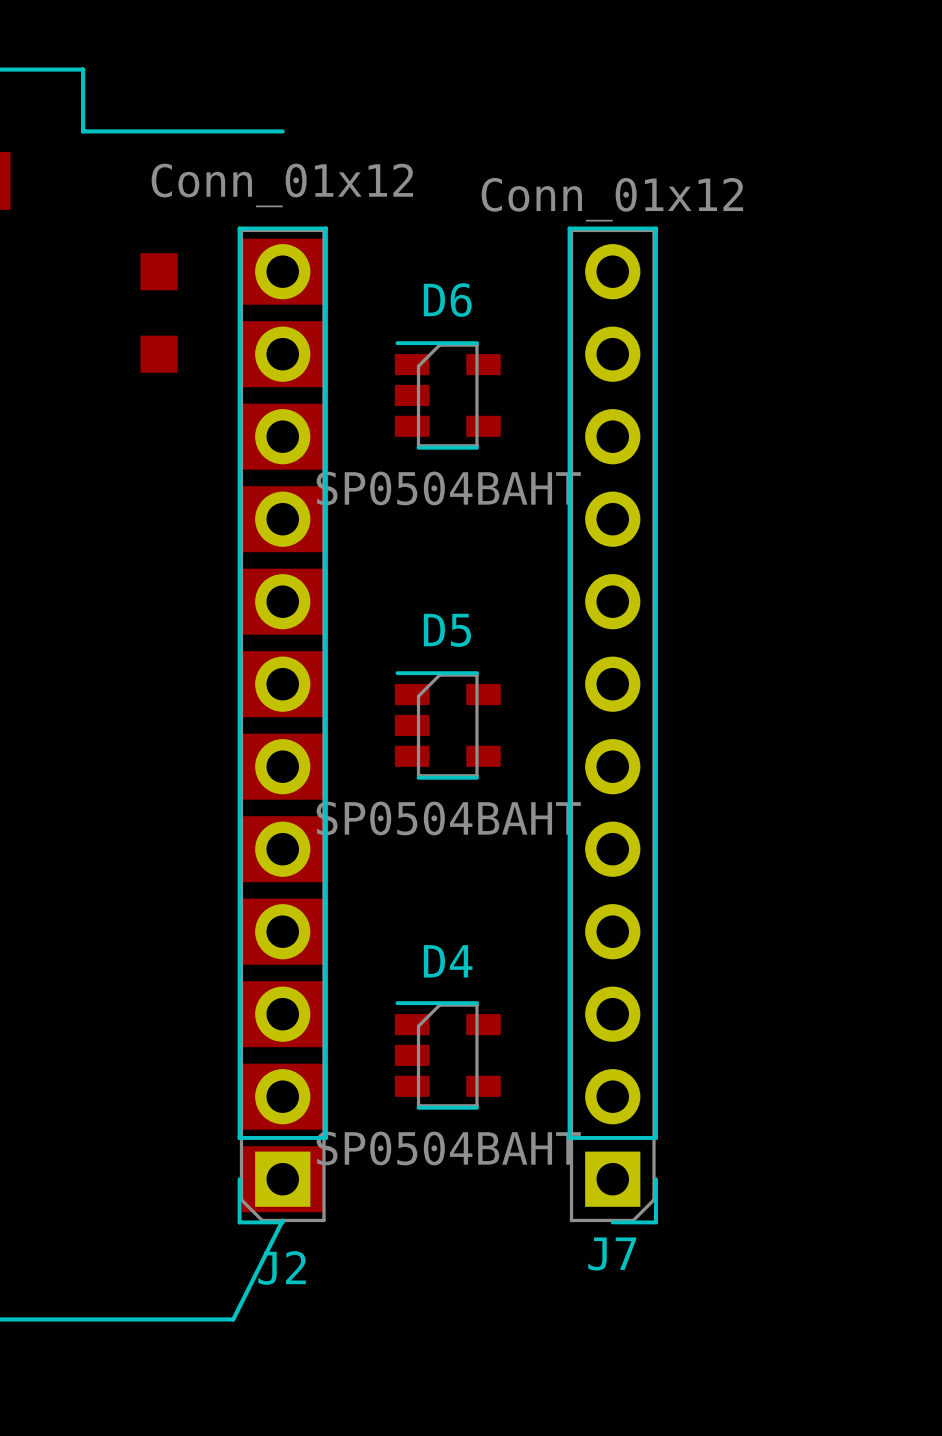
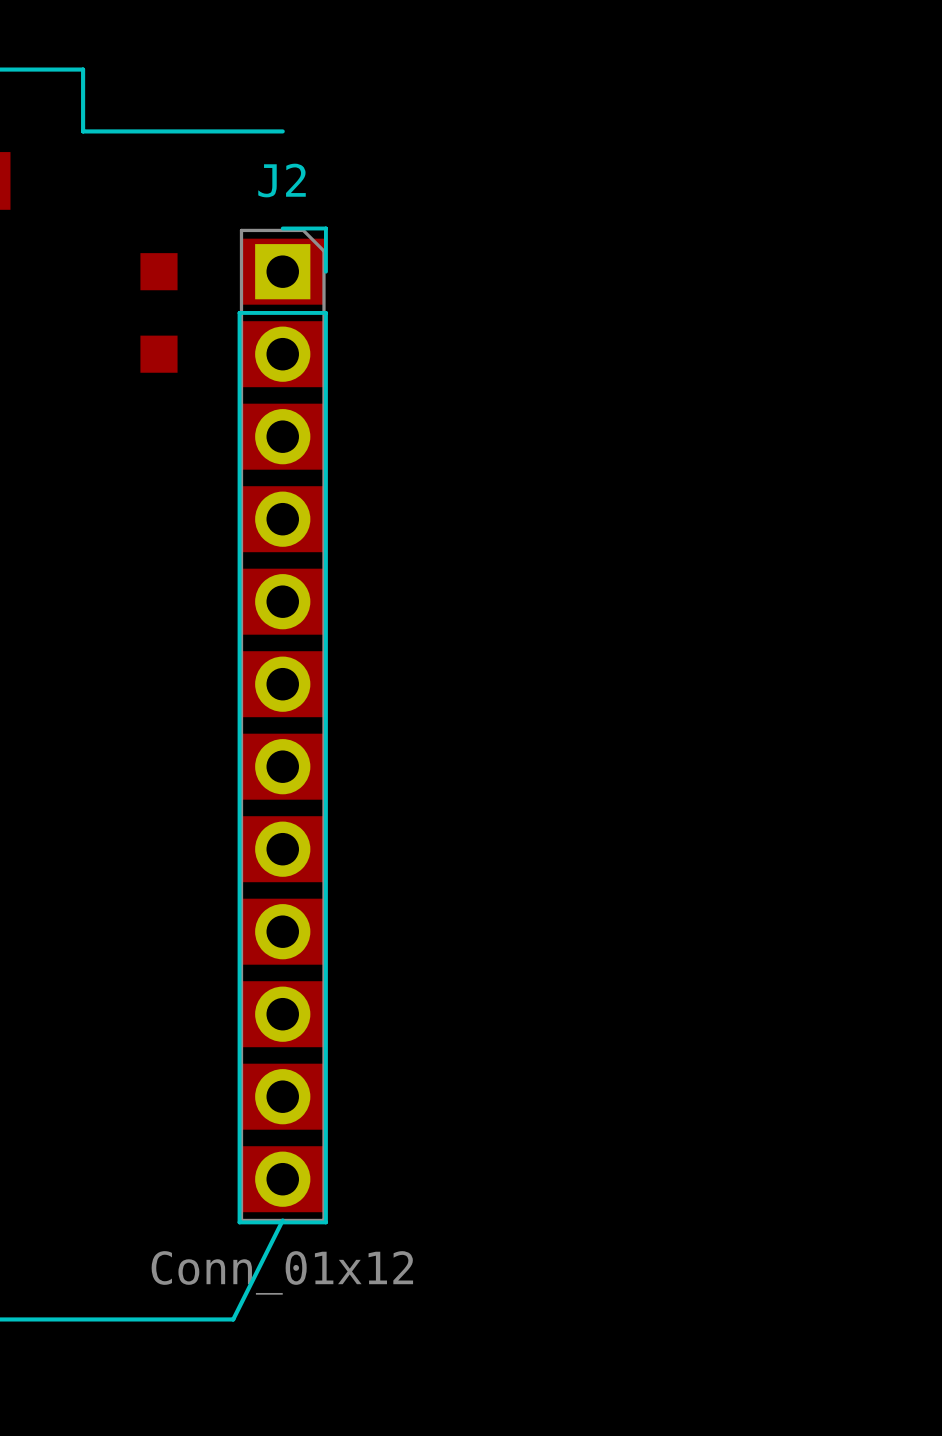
D6: SP0504BAHT (447, 395) -> none
J2 rotation: 0° (282, 725) -> 180° (282, 725)
D5: SP0504BAHT (447, 725) -> none
J7: Conn_01x12 (612, 725) -> none
D4: SP0504BAHT (447, 1055) -> none

